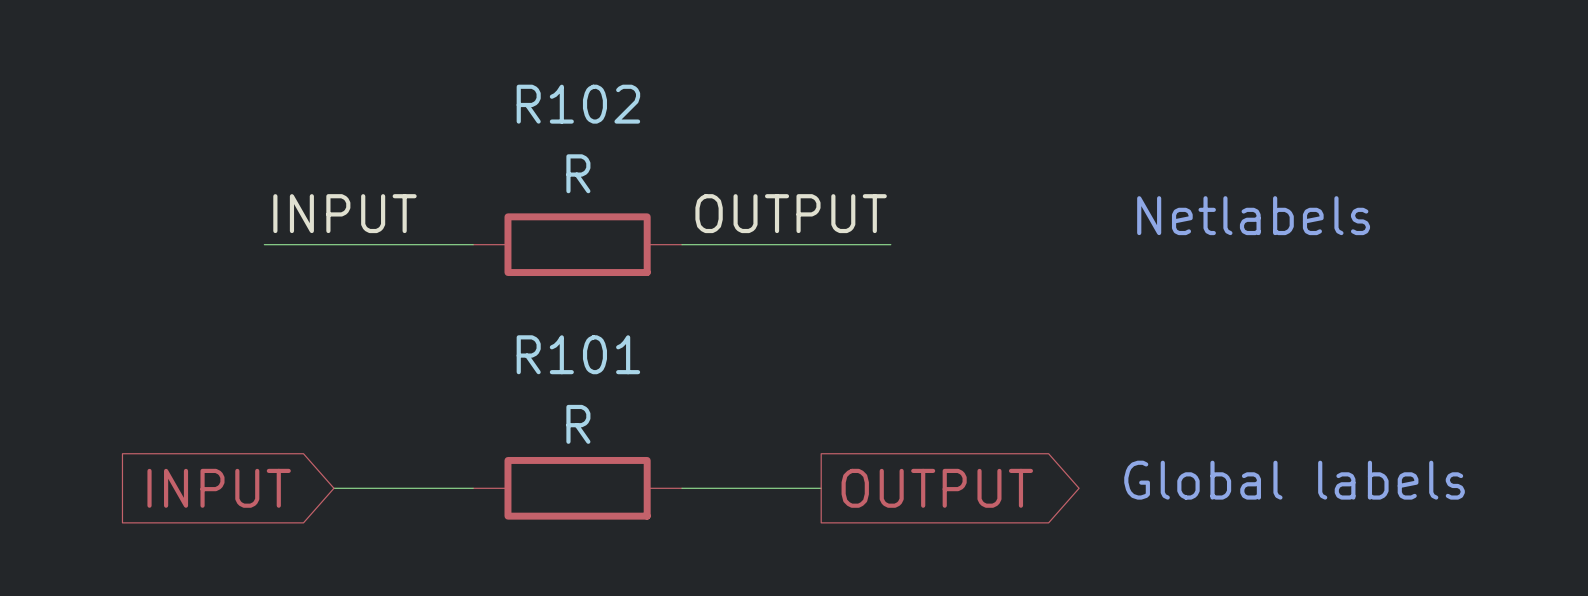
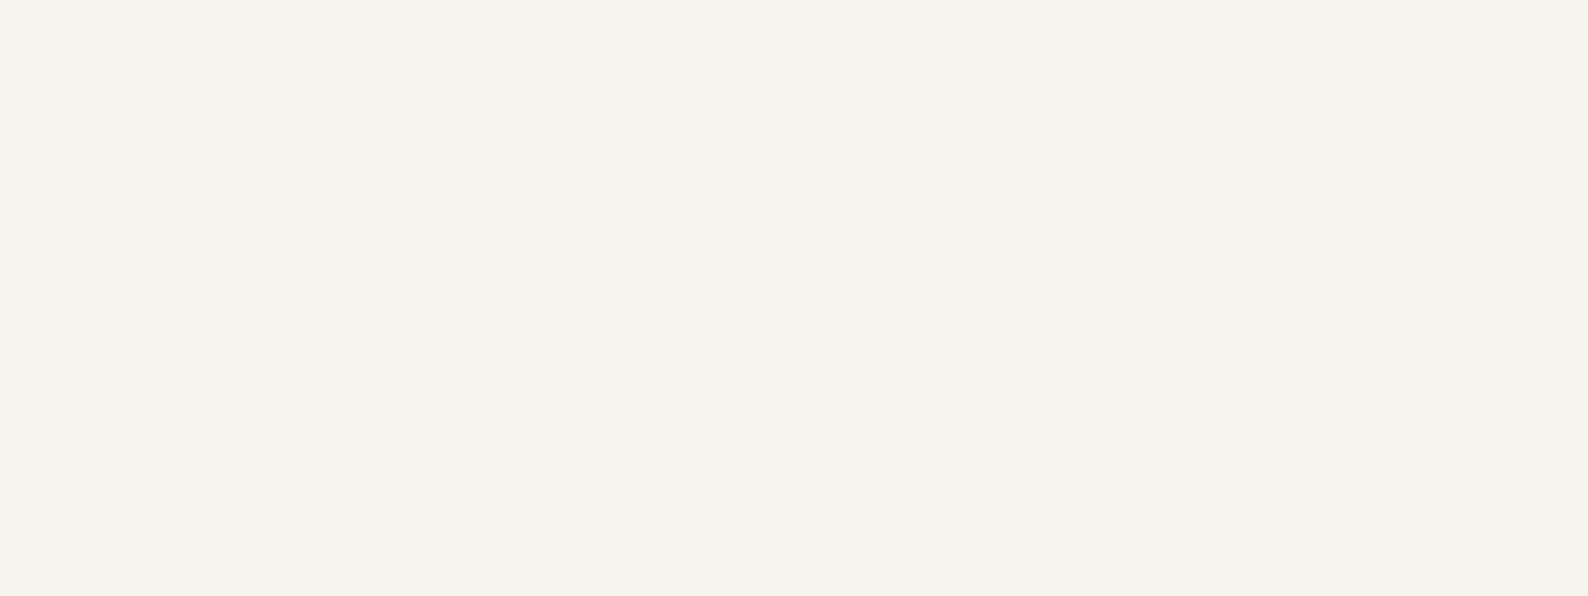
label: INPUT (344, 213) -> none
label: OUTPUT (791, 213) -> none
text: Netlabels (1253, 215) -> none
wire: (264, 244) (473, 244) -> none
R102: R (577, 244) -> none
wire: (681, 244) (890, 244) -> none
text: Global labels (1294, 480) -> none
global label: INPUT (219, 488) -> none
wire: (333, 488) (473, 488) -> none
R101: R (577, 488) -> none
wire: (681, 488) (821, 488) -> none
global label: OUTPUT (937, 488) -> none

